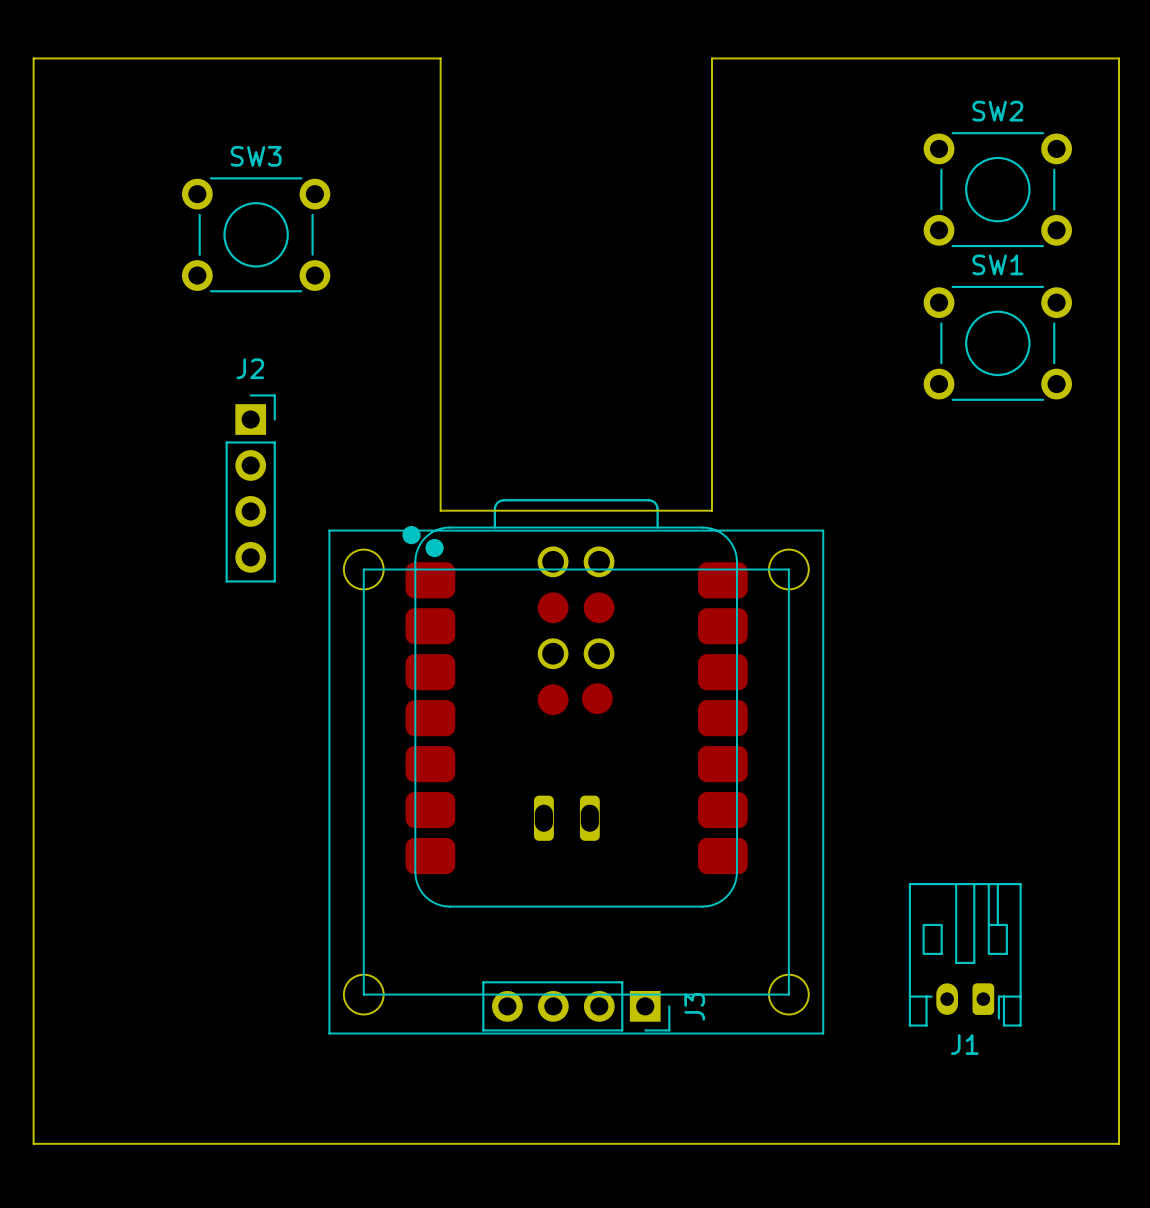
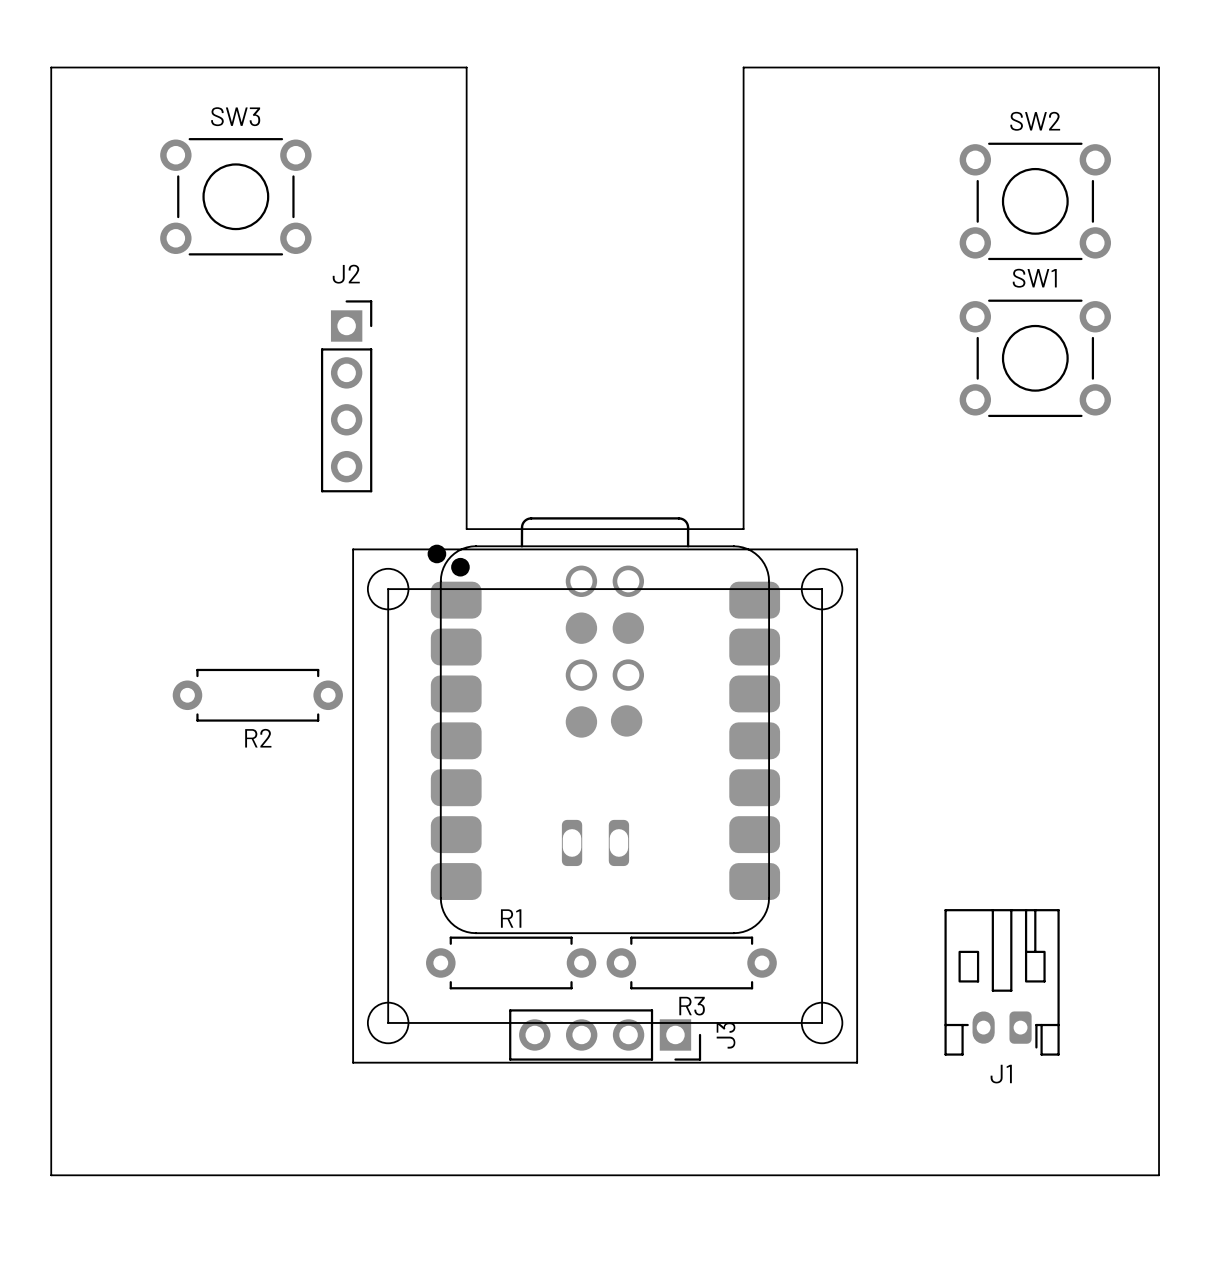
SW3 position: (256, 234) -> (235, 196)
J2 position: (250, 488) -> (346, 396)
R2: none -> (257, 695)
R1: none -> (511, 962)
R3: none -> (691, 962)

